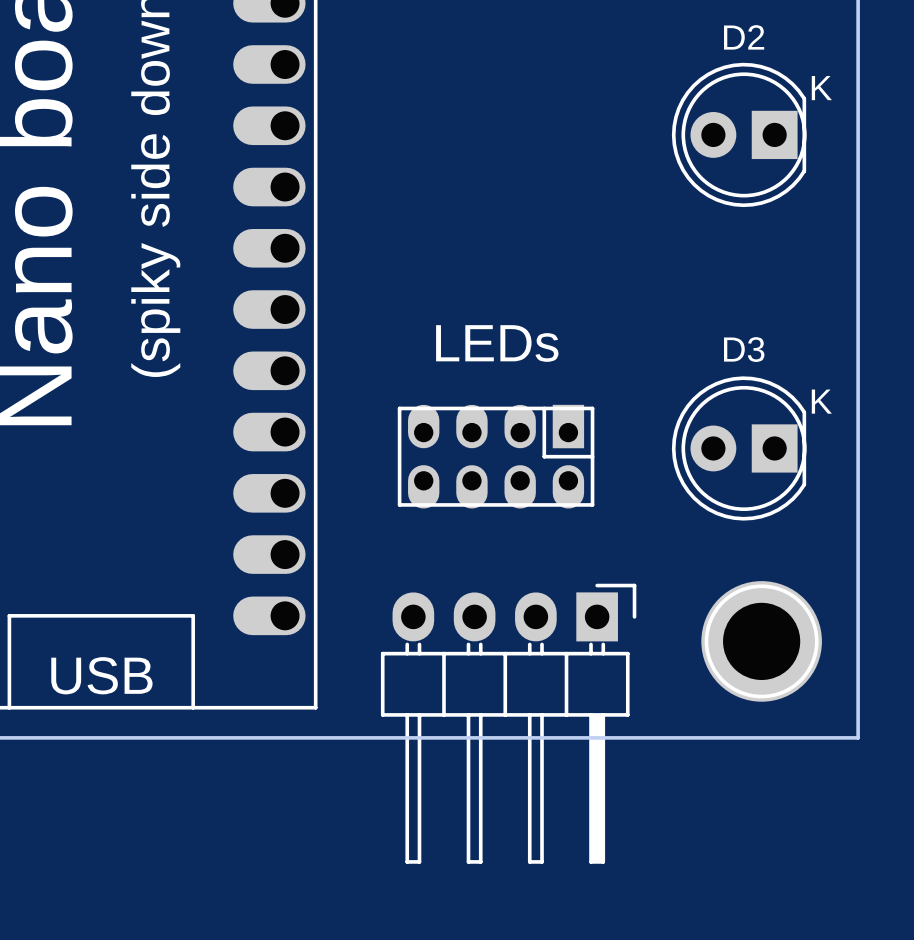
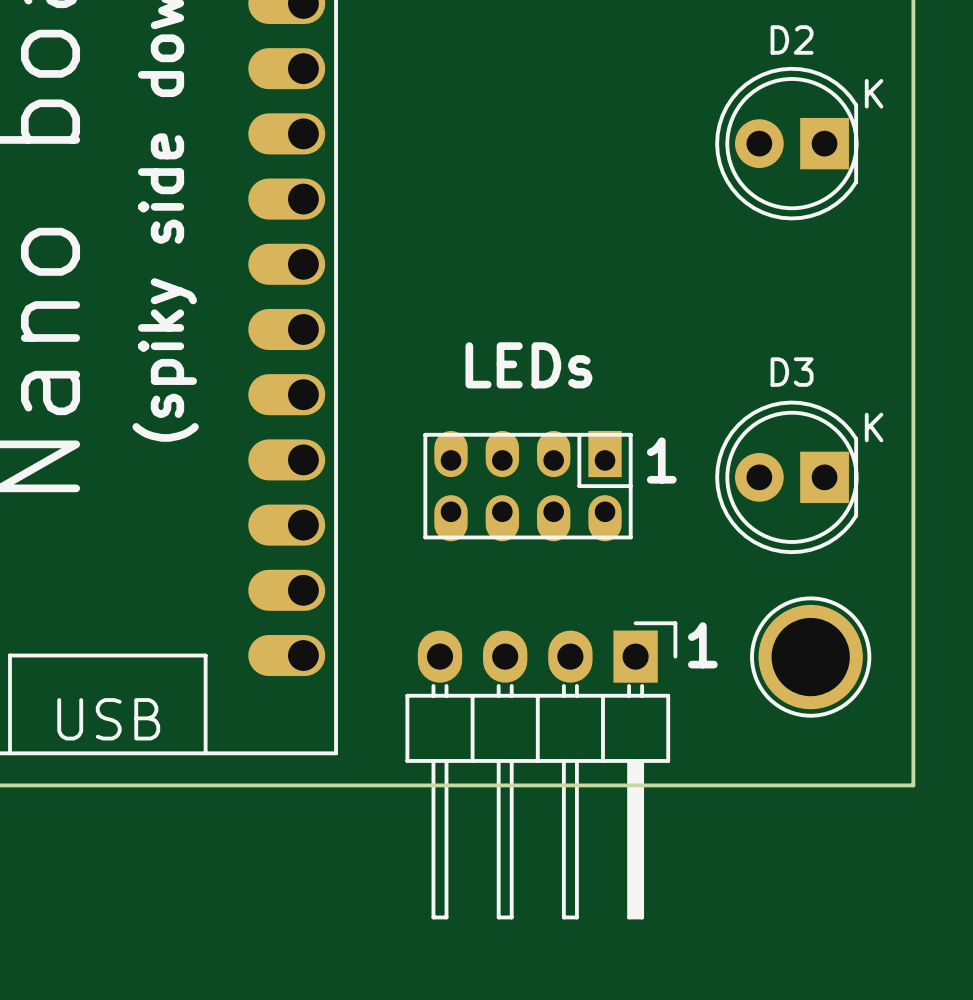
text: none -> 1 (661, 460)
part footprint: [701, 581, 822, 702] -> [750, 596, 872, 718]
text: none -> 1 (702, 645)

